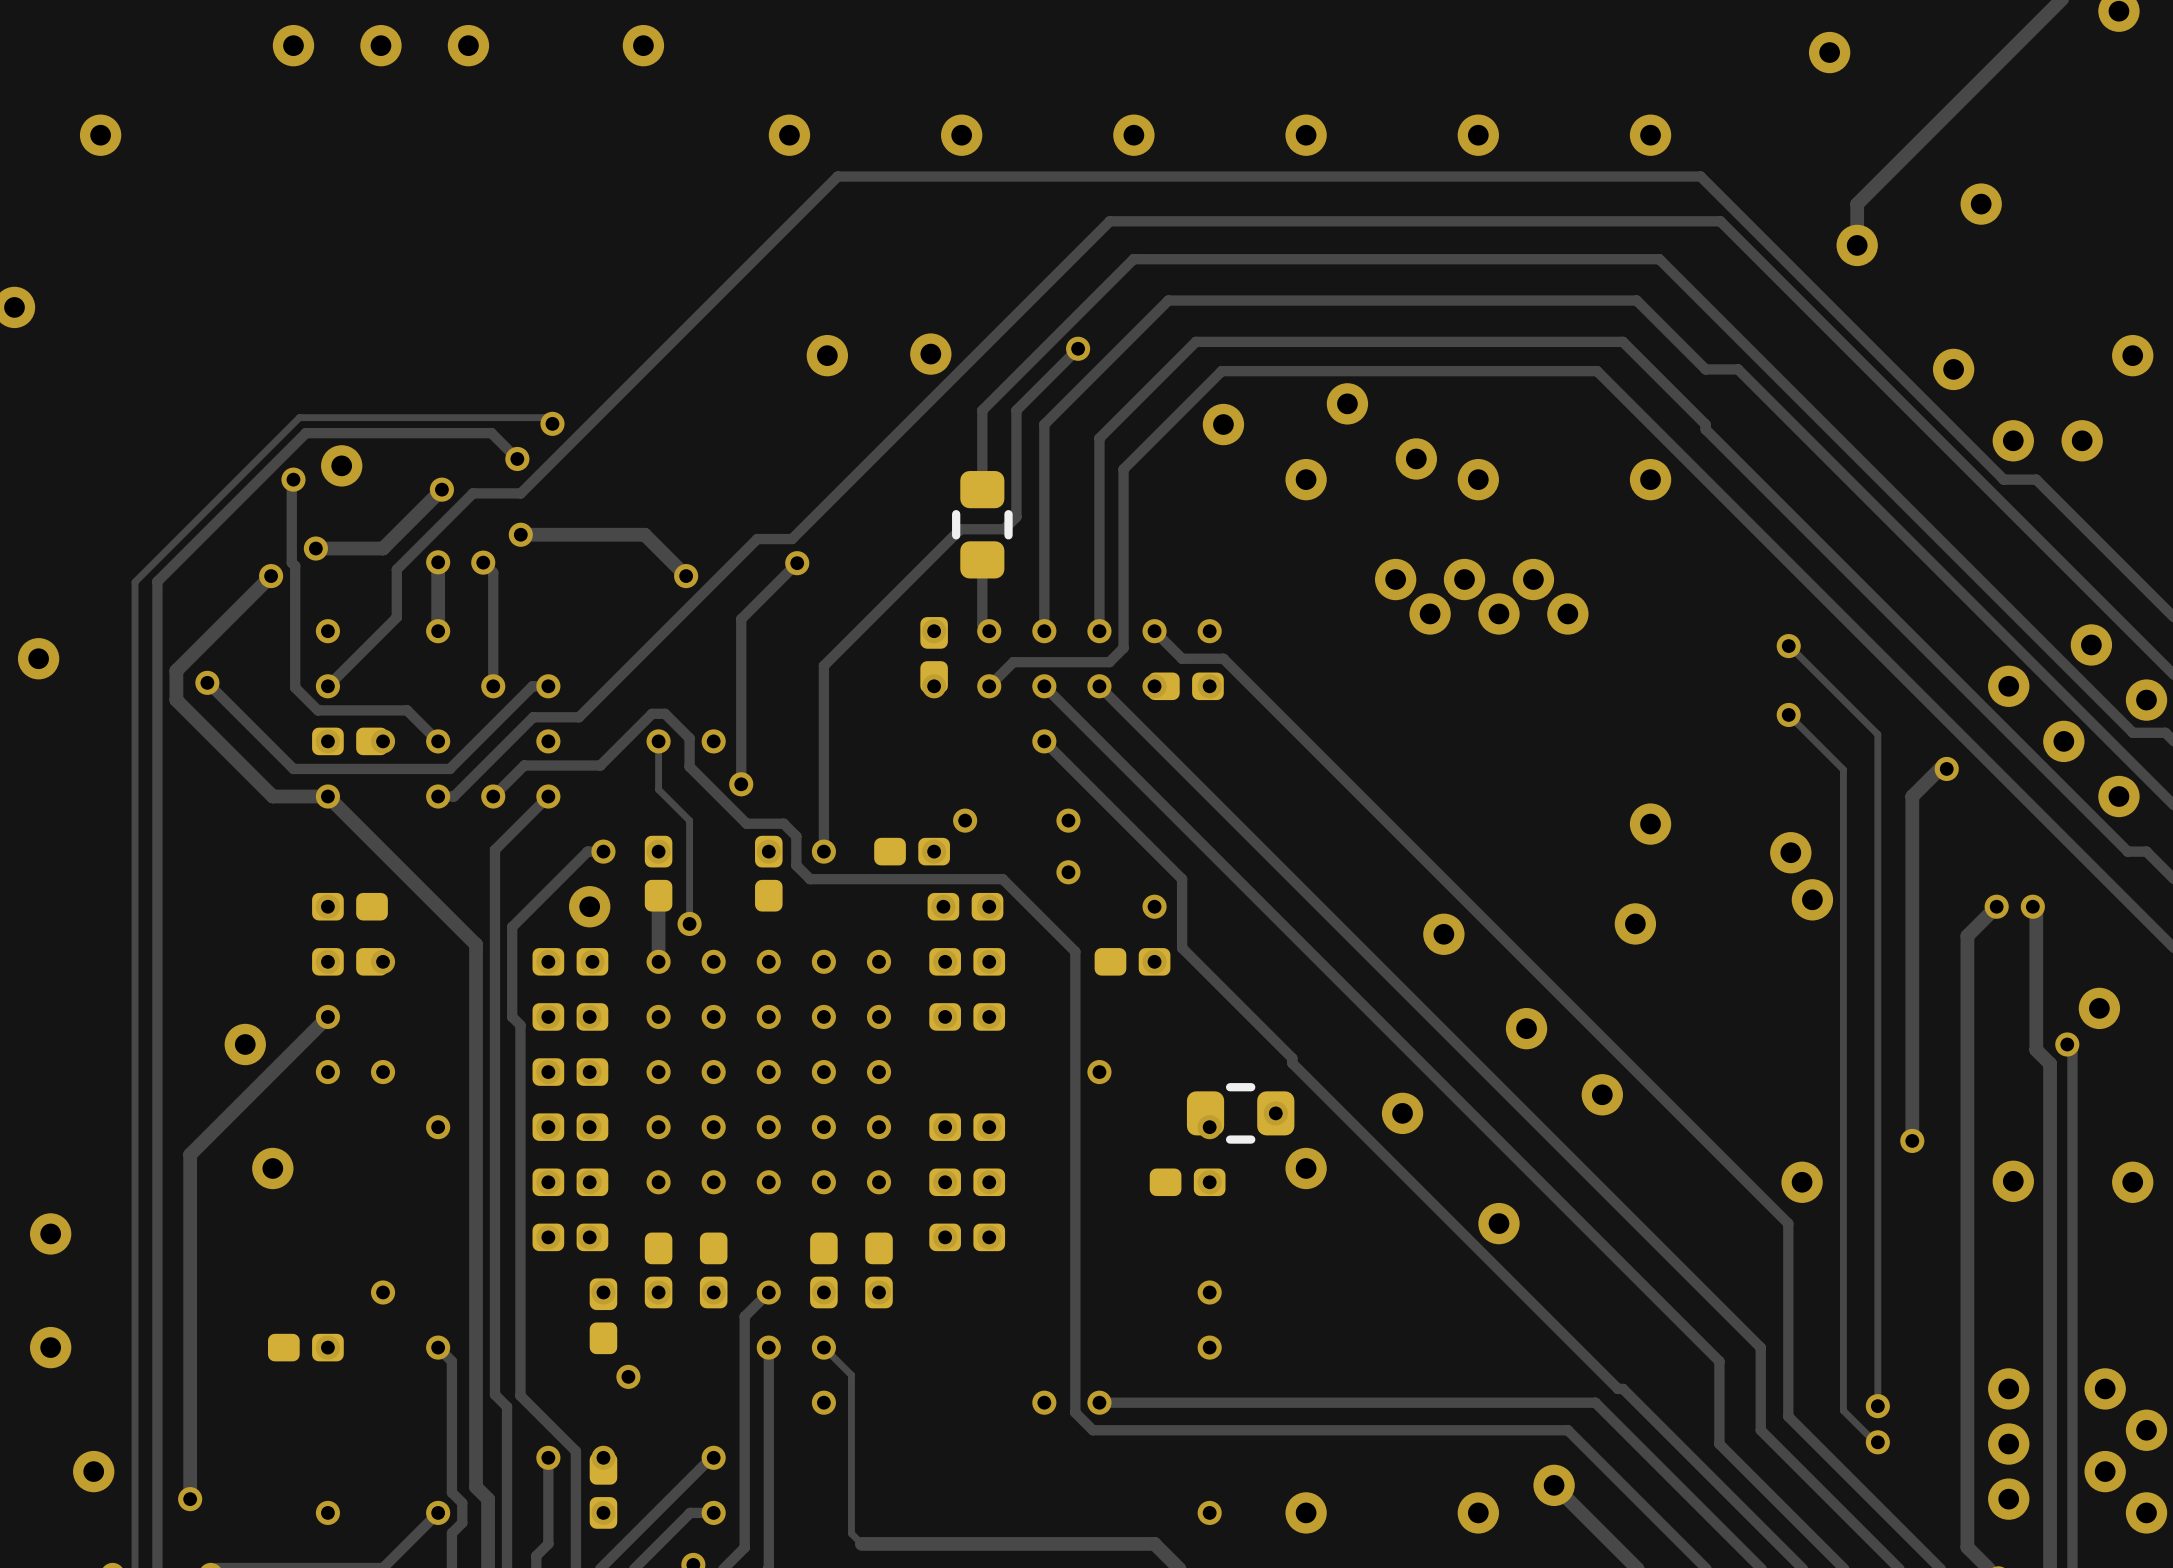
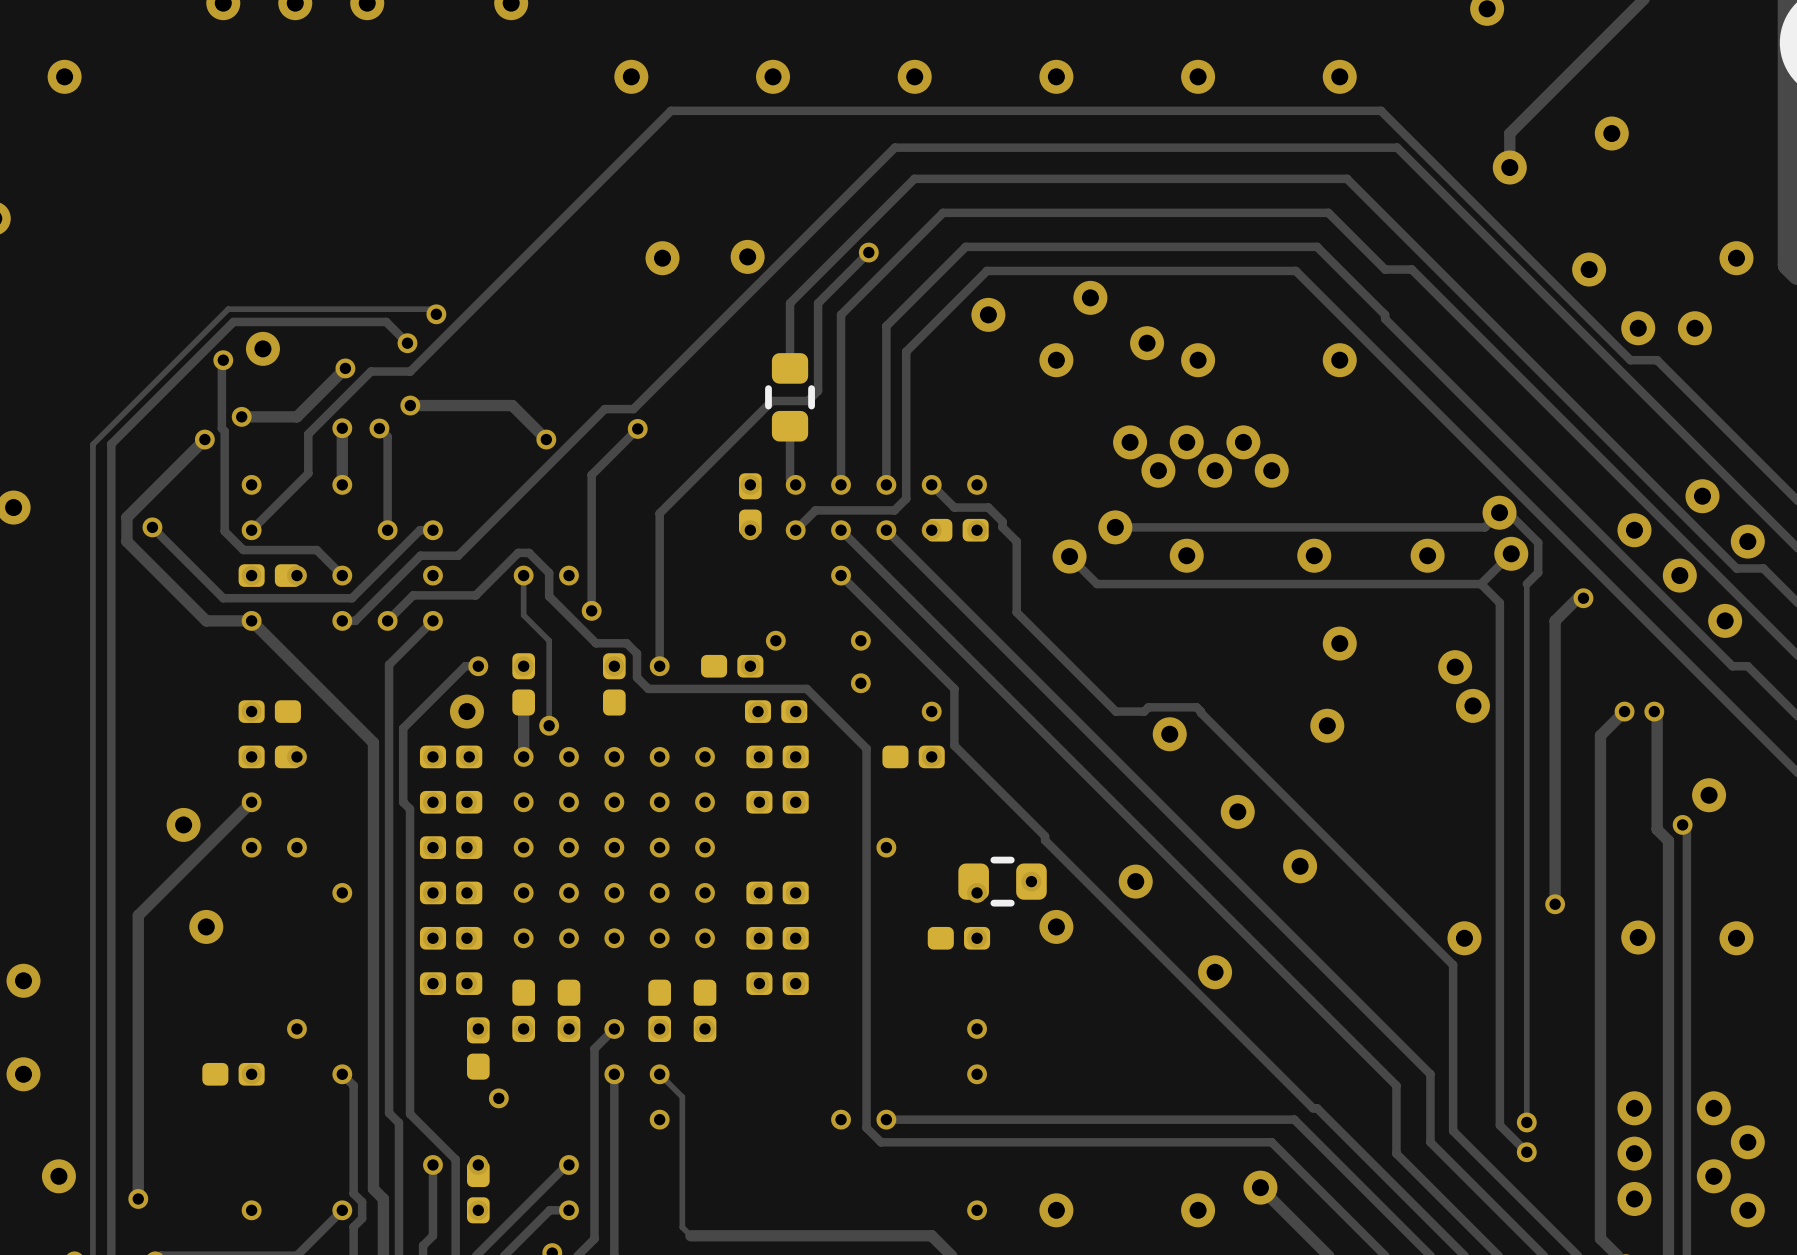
via: (1788, 646) -> none
track: (1789, 646) (1877, 734) (1877, 751) -> (1115, 527) (1484, 527) (1499, 512) (1508, 512) (1538, 542) (1538, 572) (1526, 584)
via: none -> (1499, 512)
track: (1240, 675) (1788, 1223) -> (1002, 521) (1002, 527) (1016, 541) (1016, 612) (1115, 711) (1144, 711) (1148, 707) (1196, 707) (1453, 965) (1453, 972)
via: none -> (1115, 527)
via size: [1776, 702, 1801, 728] -> [1410, 538, 1445, 573]
track: (1788, 714) (1843, 769) (1843, 1410) (1875, 1442) (1877, 1442) -> (1481, 584) (1499, 602) (1499, 1125) (1526, 1152)
via: none -> (1511, 553)
via: none -> (1186, 555)
via: none -> (1314, 555)
track: none -> (1069, 556) (1097, 584) (1481, 584)
via: none -> (1069, 556)
track: none -> (1511, 557) (1511, 553) (1481, 584)

